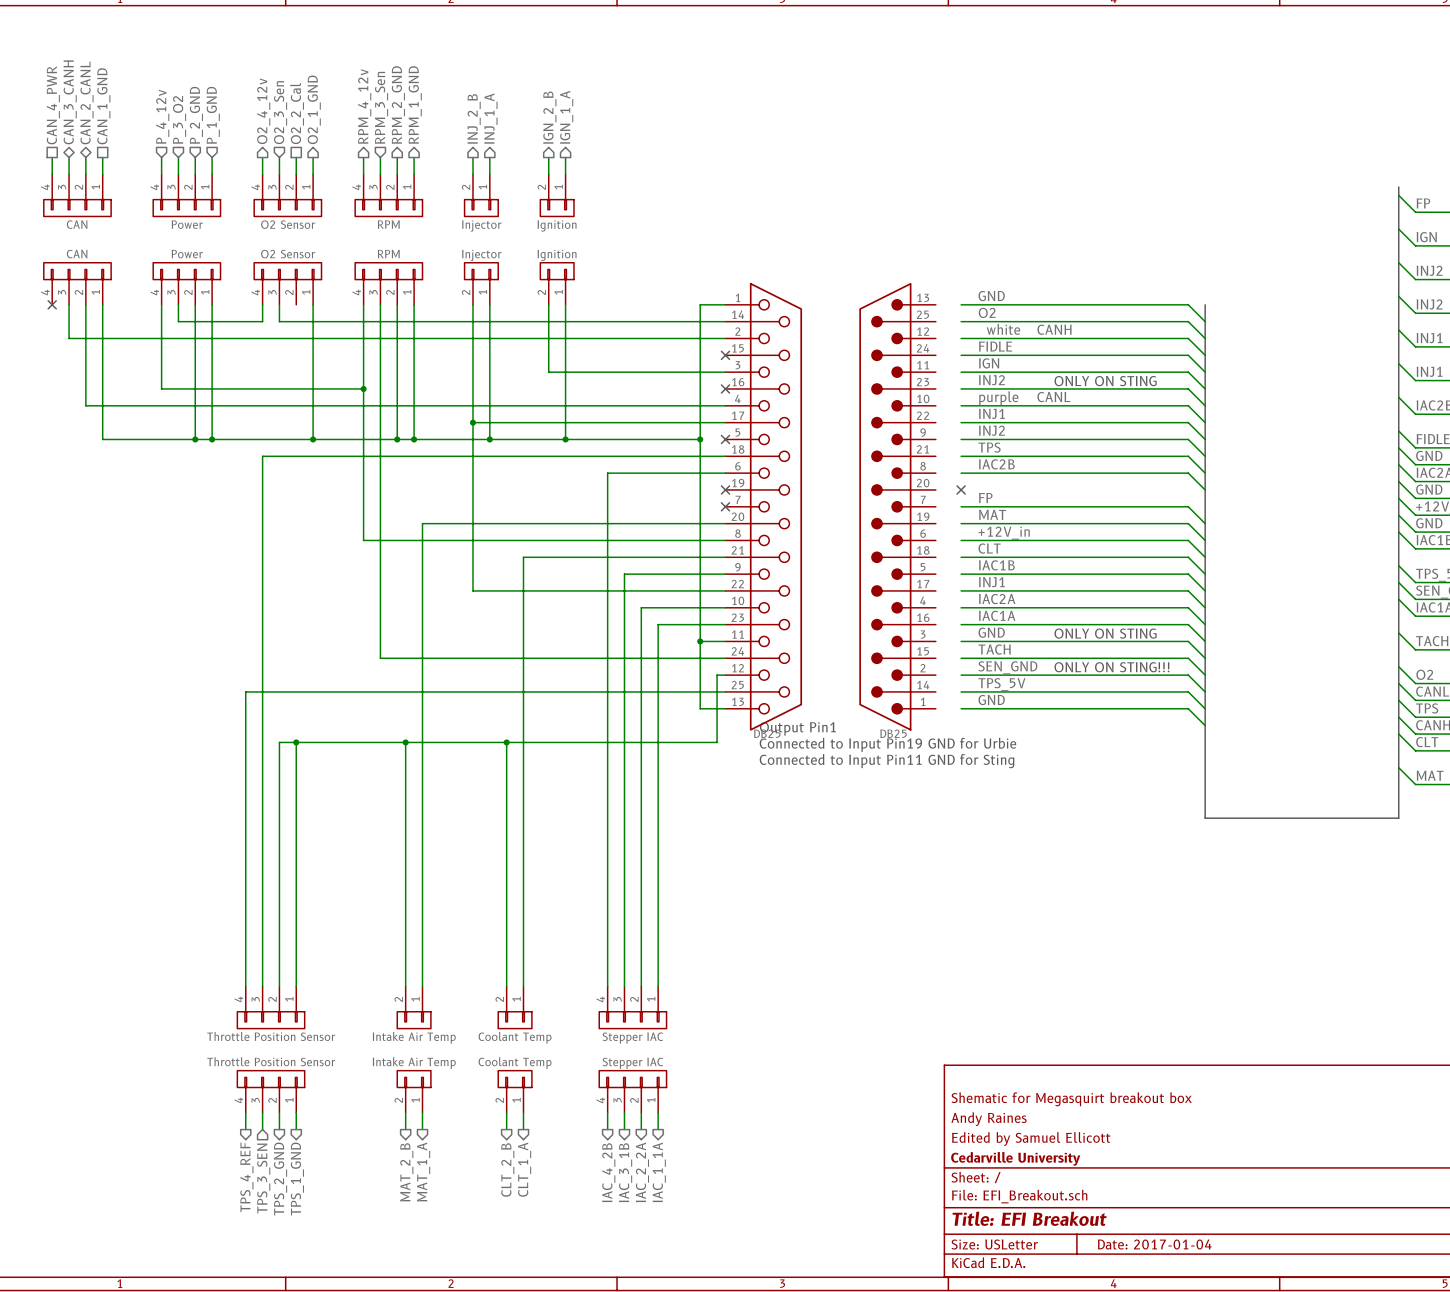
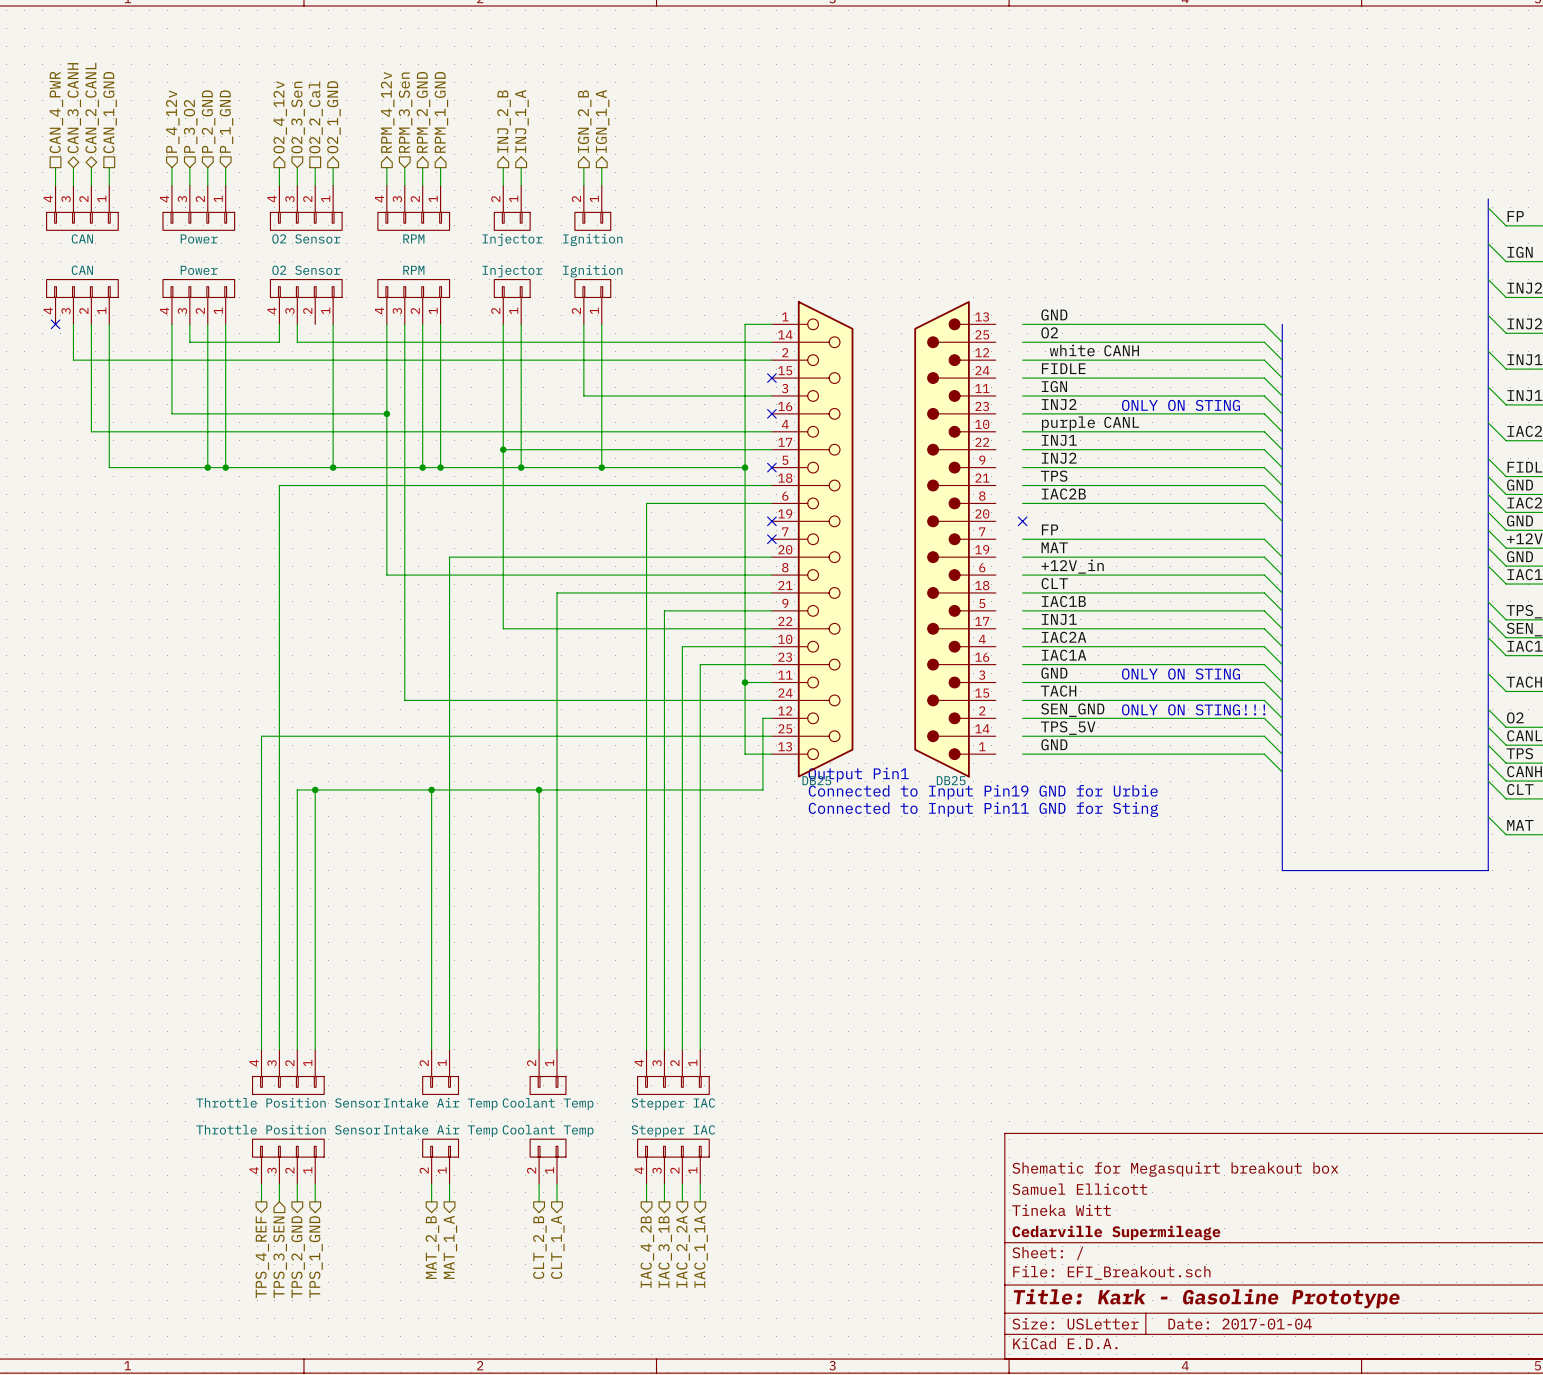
title block: Andy Raines (988, 1119) -> Samuel Ellicott (1079, 1189)
title block: Edited by Samuel Ellicott (1031, 1138) -> Tineka Witt (1061, 1210)
title block: Cedarville University (1015, 1158) -> Cedarville Supermileage (1116, 1232)
title block: Title: EFI Breakout (1029, 1218) -> Title: Kark - Gasoline Prototype (1206, 1298)

